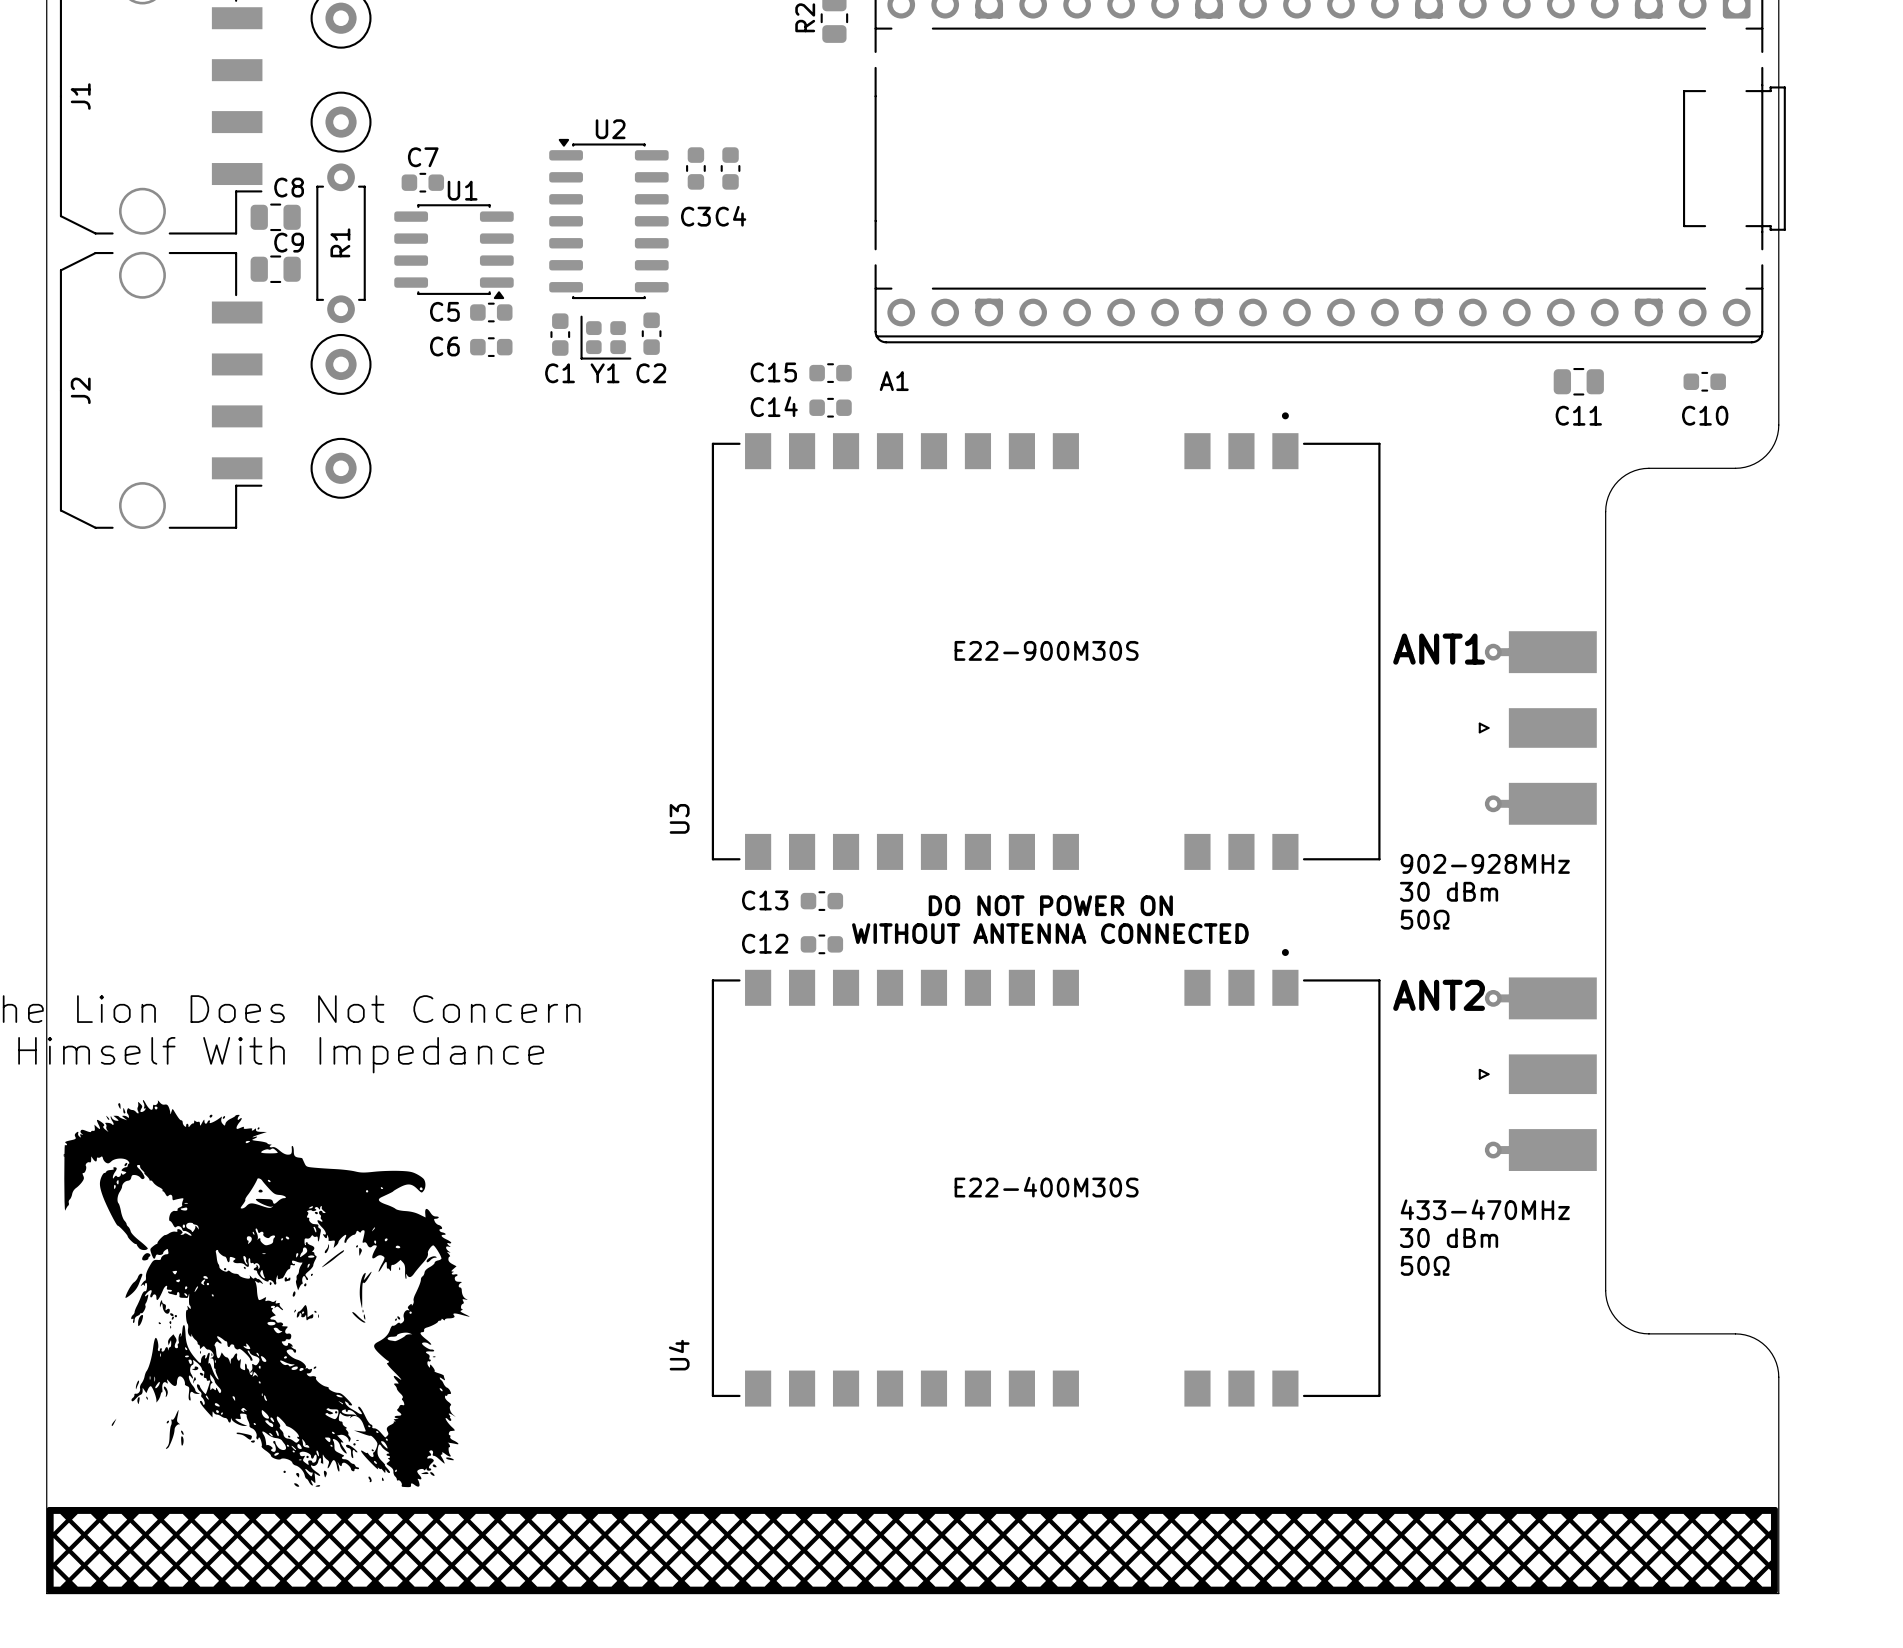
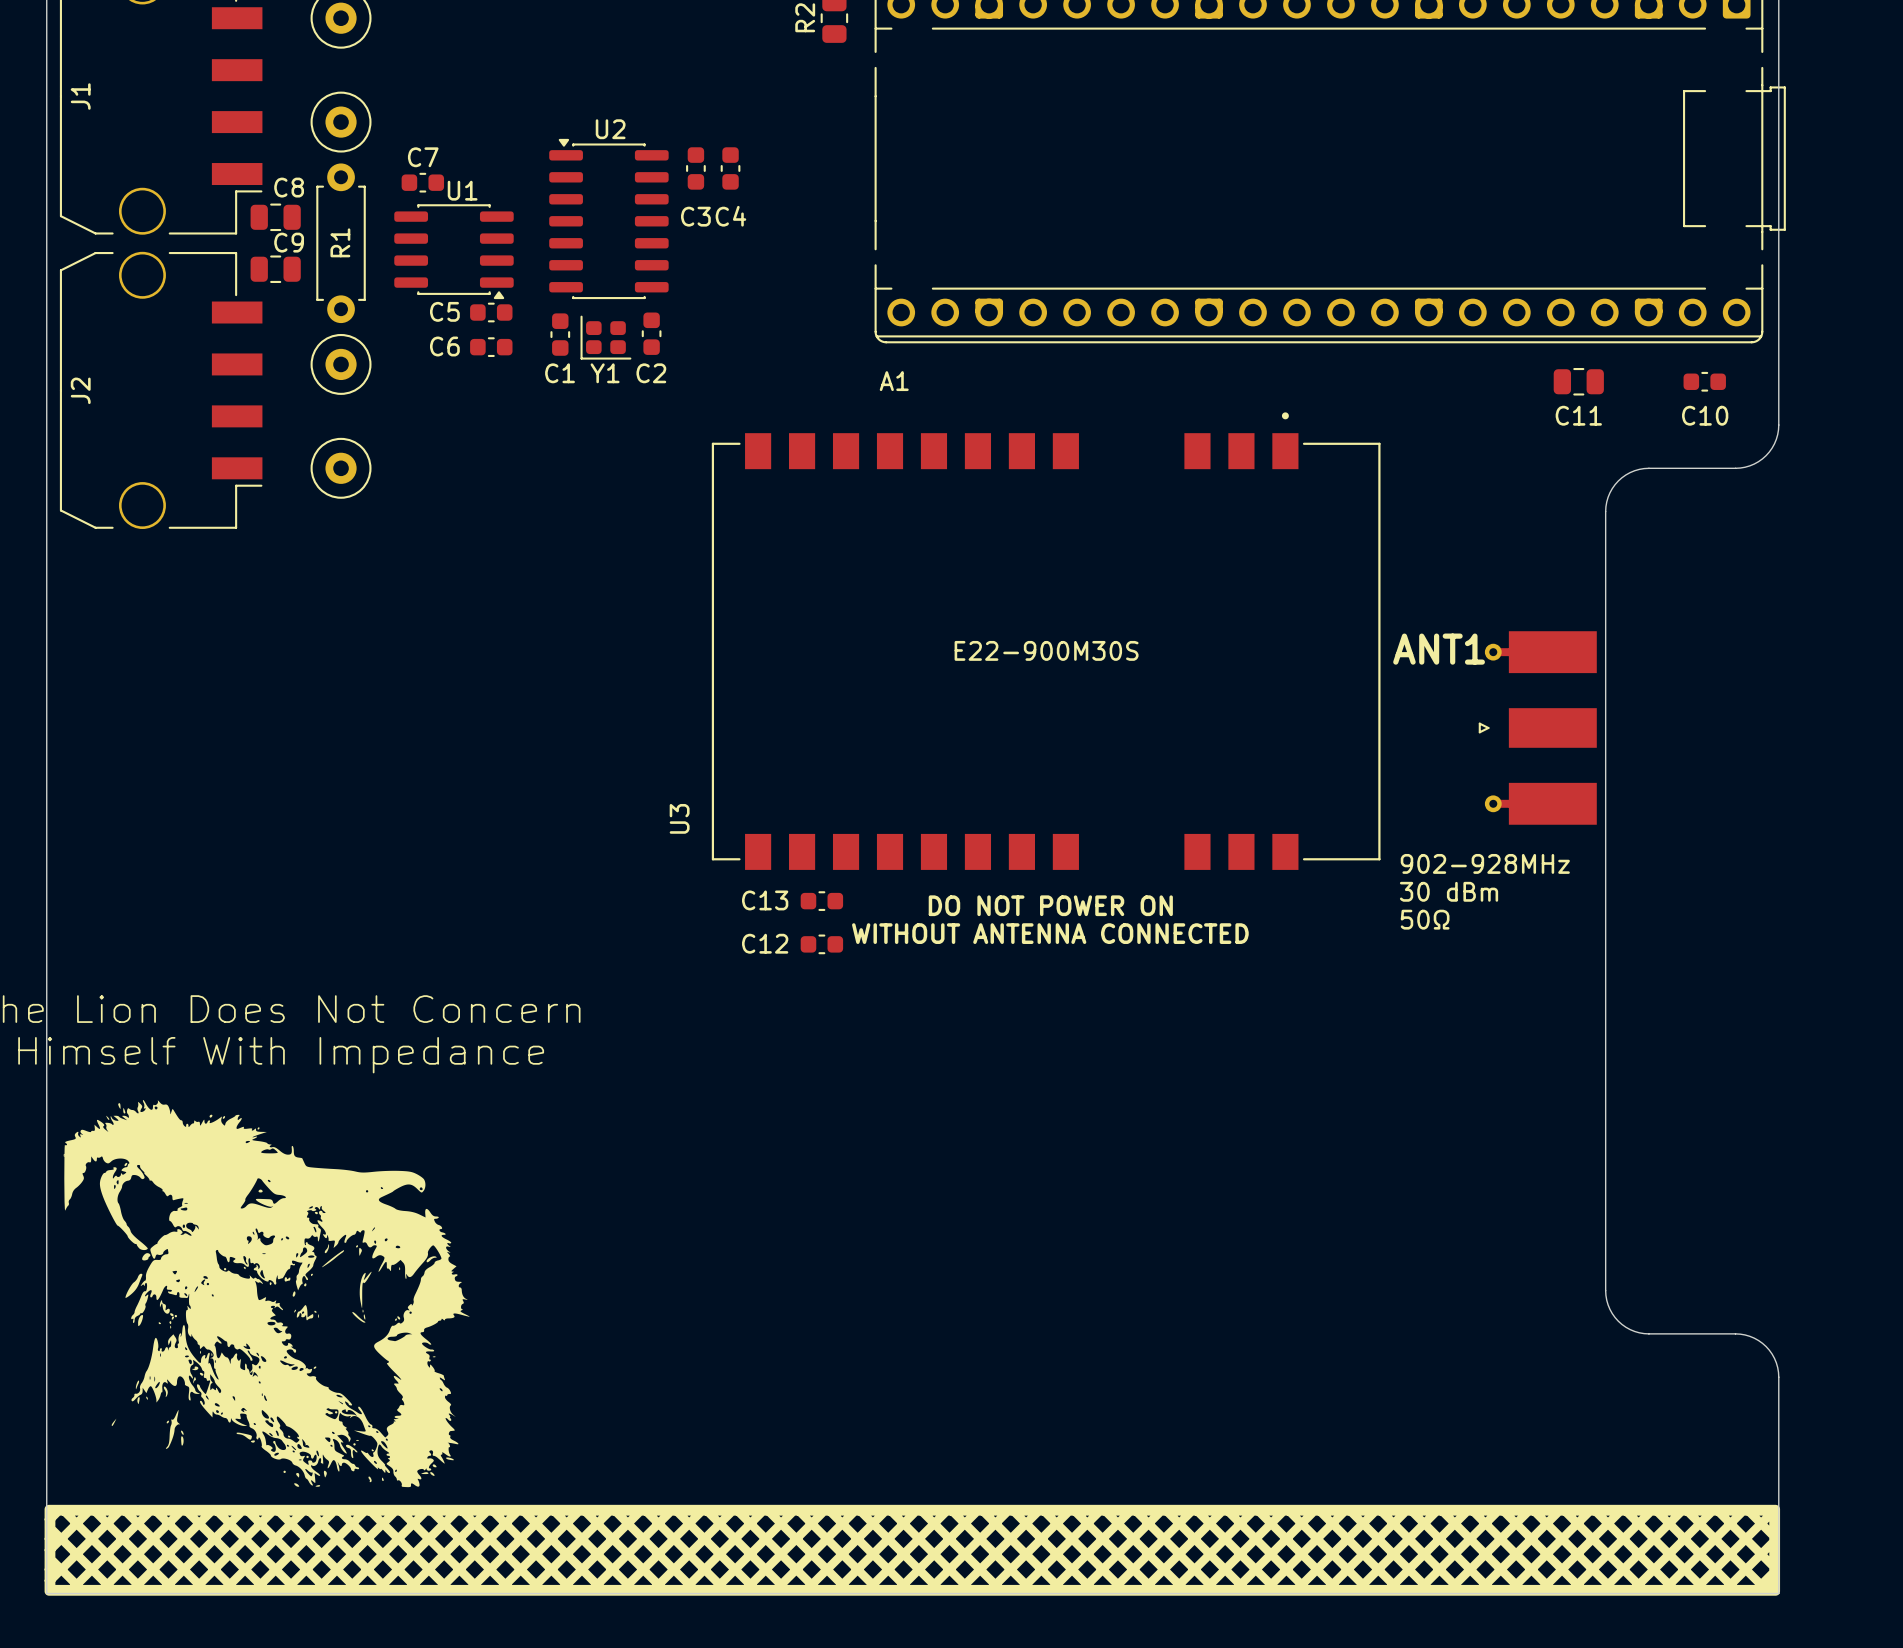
C15: (830, 373) -> none
C14: (830, 407) -> none
ANT2: (1537, 1074) -> none
U4: E22-400M30S (1046, 1177) -> none
text: 433-470MHz (1485, 1209) -> none
text: 30 dBm (1449, 1238) -> none
text: 50Ω (1425, 1265) -> none
drawing shape: [46, 1507, 1778, 1594] -> [44, 1504, 1781, 1596]

